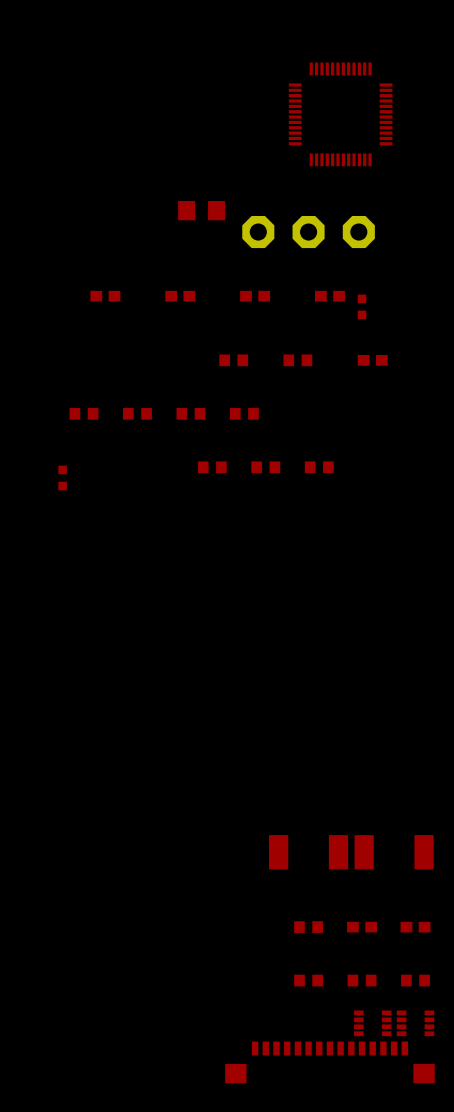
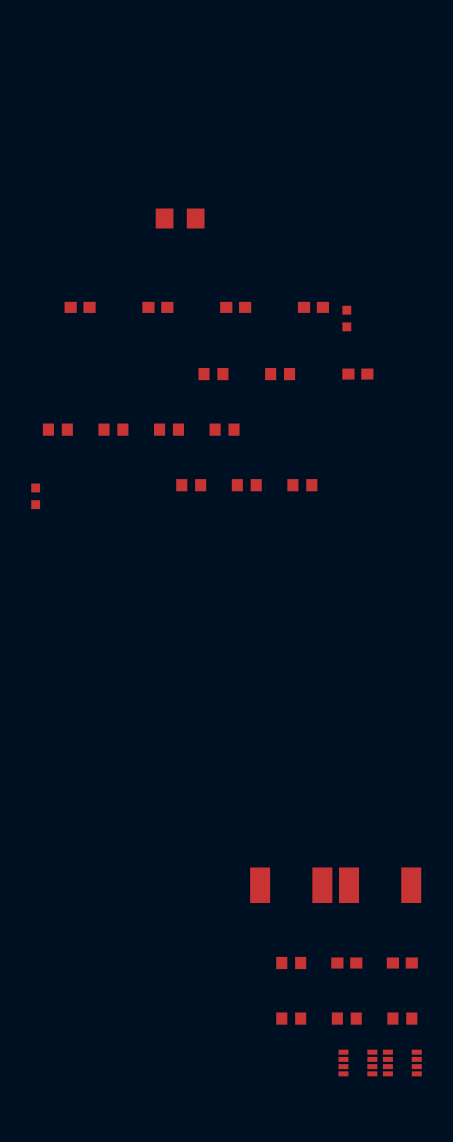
part: (340, 114) -> none
part: (308, 232) -> none
part: (329, 1062) -> none

